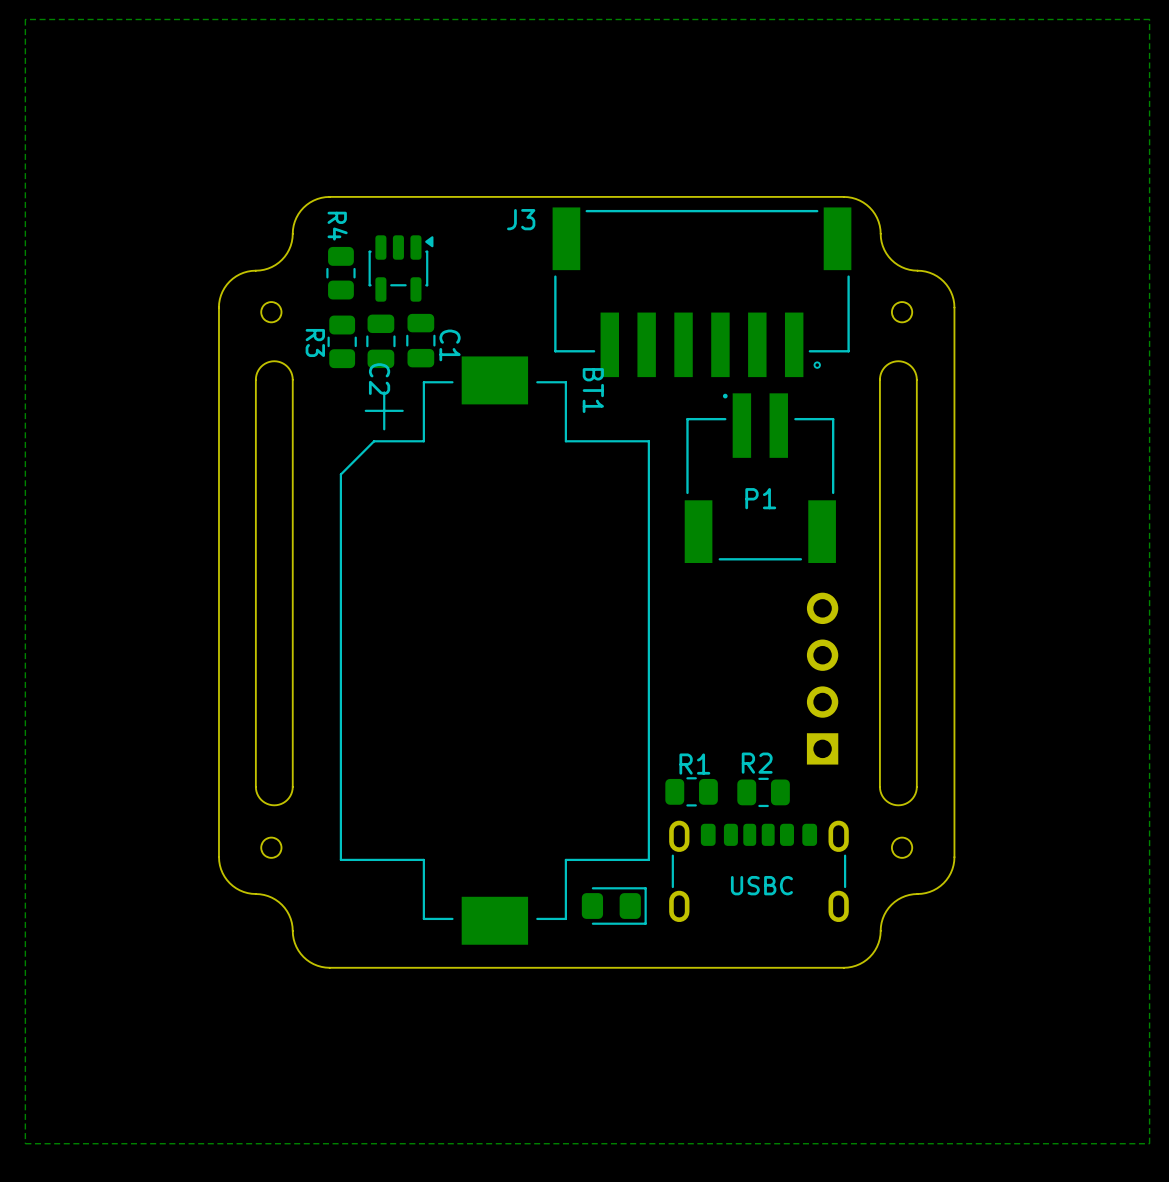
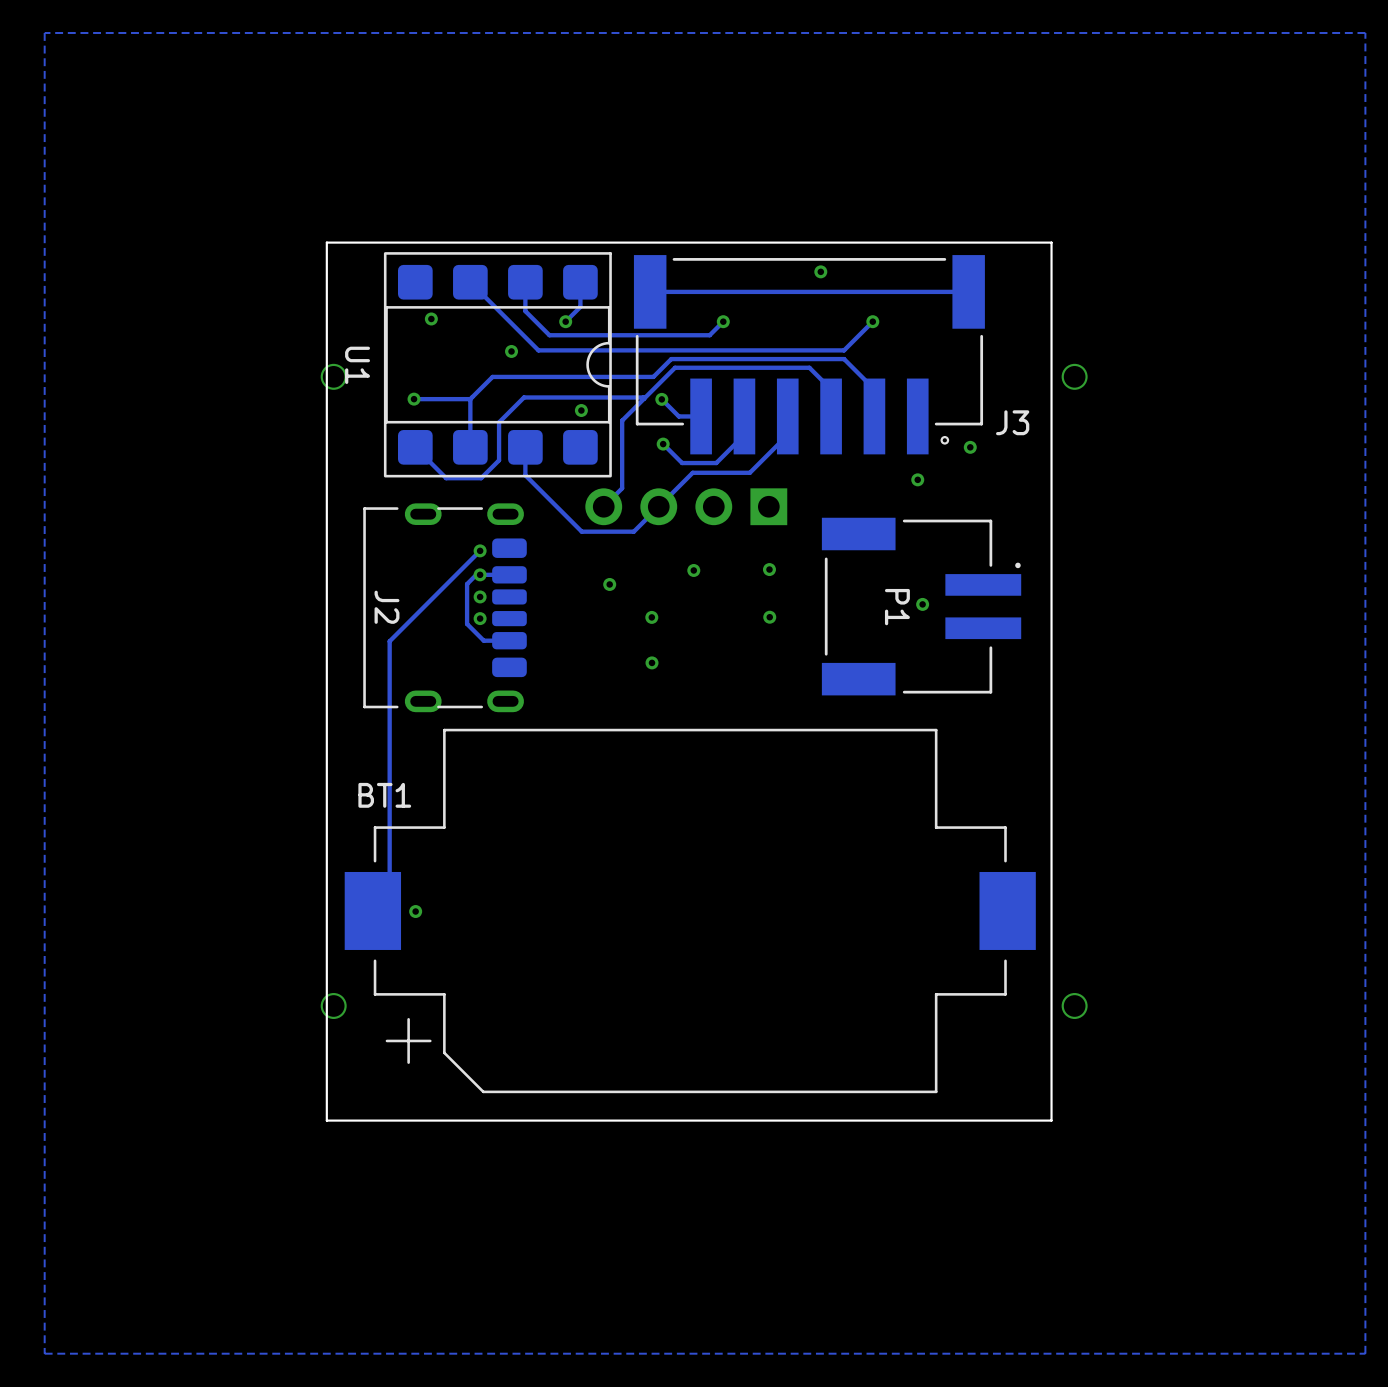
board edge: (843, 196) (325, 197) (310, 202) (298, 214) (293, 225) (290, 245) (281, 259) (268, 268) (239, 274) (224, 287) (218, 307) (219, 861) (224, 876) (236, 888) (247, 893) (268, 896) (281, 904) (290, 918) (296, 946) (310, 962) (329, 967) (847, 967) (863, 962) (875, 950) (879, 939) (882, 918) (891, 904) (905, 896) (933, 890) (948, 876) (954, 857) (954, 303) (948, 287) (937, 276) (925, 271) (905, 268) (891, 259) (882, 245) (879, 225) (872, 210) (859, 200) (843, 196) -> (1051, 242) (1051, 1120) (326, 1120) (326, 242) (1051, 242)
J3 name position: J3 (521, 219) -> J3 (1012, 422)
via: none -> (820, 271)
track: none -> (470, 282) (538, 350) (844, 350) (872, 321)
track: none -> (525, 282) (525, 311) (549, 335) (709, 335) (723, 321)
track: none -> (580, 282) (580, 306) (565, 321)
track: none -> (968, 291) (650, 291)
via: none -> (431, 318)
via: none -> (565, 321)
via: none -> (723, 321)
via: none -> (872, 321)
part: (401, 268) -> none
R4: (340, 273) -> none
via: none -> (511, 351)
J3 position: (701, 292) -> (809, 354)
U1: none -> (497, 364)
track: none -> (644, 398) (524, 397) (499, 422) (499, 460) (481, 478) (446, 478) (415, 447)
via: none -> (414, 399)
track: none -> (470, 399) (414, 399)
track: none -> (470, 399) (492, 376) (653, 376) (671, 359) (844, 359) (874, 389) (874, 416)
track: none -> (470, 399) (470, 447)
track: none -> (661, 399) (678, 416) (701, 416)
via: none -> (661, 399)
C1: (420, 340) -> none
via: none -> (581, 410)
R3: (342, 341) -> none
C2: (380, 341) -> none
track: none -> (744, 416) (744, 434) (716, 463) (682, 463) (663, 444)
track: none -> (787, 416) (787, 434) (749, 472) (692, 472) (633, 531) (581, 531) (525, 475) (525, 447)
track: none -> (831, 416) (831, 389) (809, 367) (675, 367) (622, 420) (622, 488) (603, 506)
via: none -> (663, 444)
via: none -> (970, 447)
board edge: (292, 379) (292, 786) (287, 799) (274, 805) (261, 799) (255, 786) (255, 379) (261, 366) (274, 361) (287, 366) (292, 379) -> none
board edge: (916, 379) (916, 786) (911, 799) (898, 805) (885, 799) (879, 786) (879, 379) (885, 366) (898, 361) (911, 366) (916, 379) -> none
via: none -> (917, 479)
track: none -> (480, 550) (389, 641) (389, 885)
via: none -> (480, 550)
via: none -> (769, 569)
via: none -> (693, 570)
P1 rotation: 0° (760, 478) -> 90° clockwise (921, 606)
via: none -> (480, 574)
track: none -> (509, 574) (476, 574) (467, 584) (467, 623) (483, 640) (509, 640)
via: none -> (609, 584)
via: none -> (480, 596)
via: none -> (922, 604)
J2: none -> (445, 607)
via: none -> (651, 617)
via: none -> (769, 617)
via: none -> (480, 618)
via: none -> (652, 662)
BT1 rotation: 0° (494, 650) -> 90° counterclockwise (690, 910)
part rotation: 0° (822, 678) -> 90° counterclockwise (686, 506)
part position: (822, 678) -> (686, 506)
via: none -> (415, 911)
R1: (691, 791) -> none
R2: (763, 792) -> none
USBC: (758, 871) -> none
part: (614, 906) -> none

